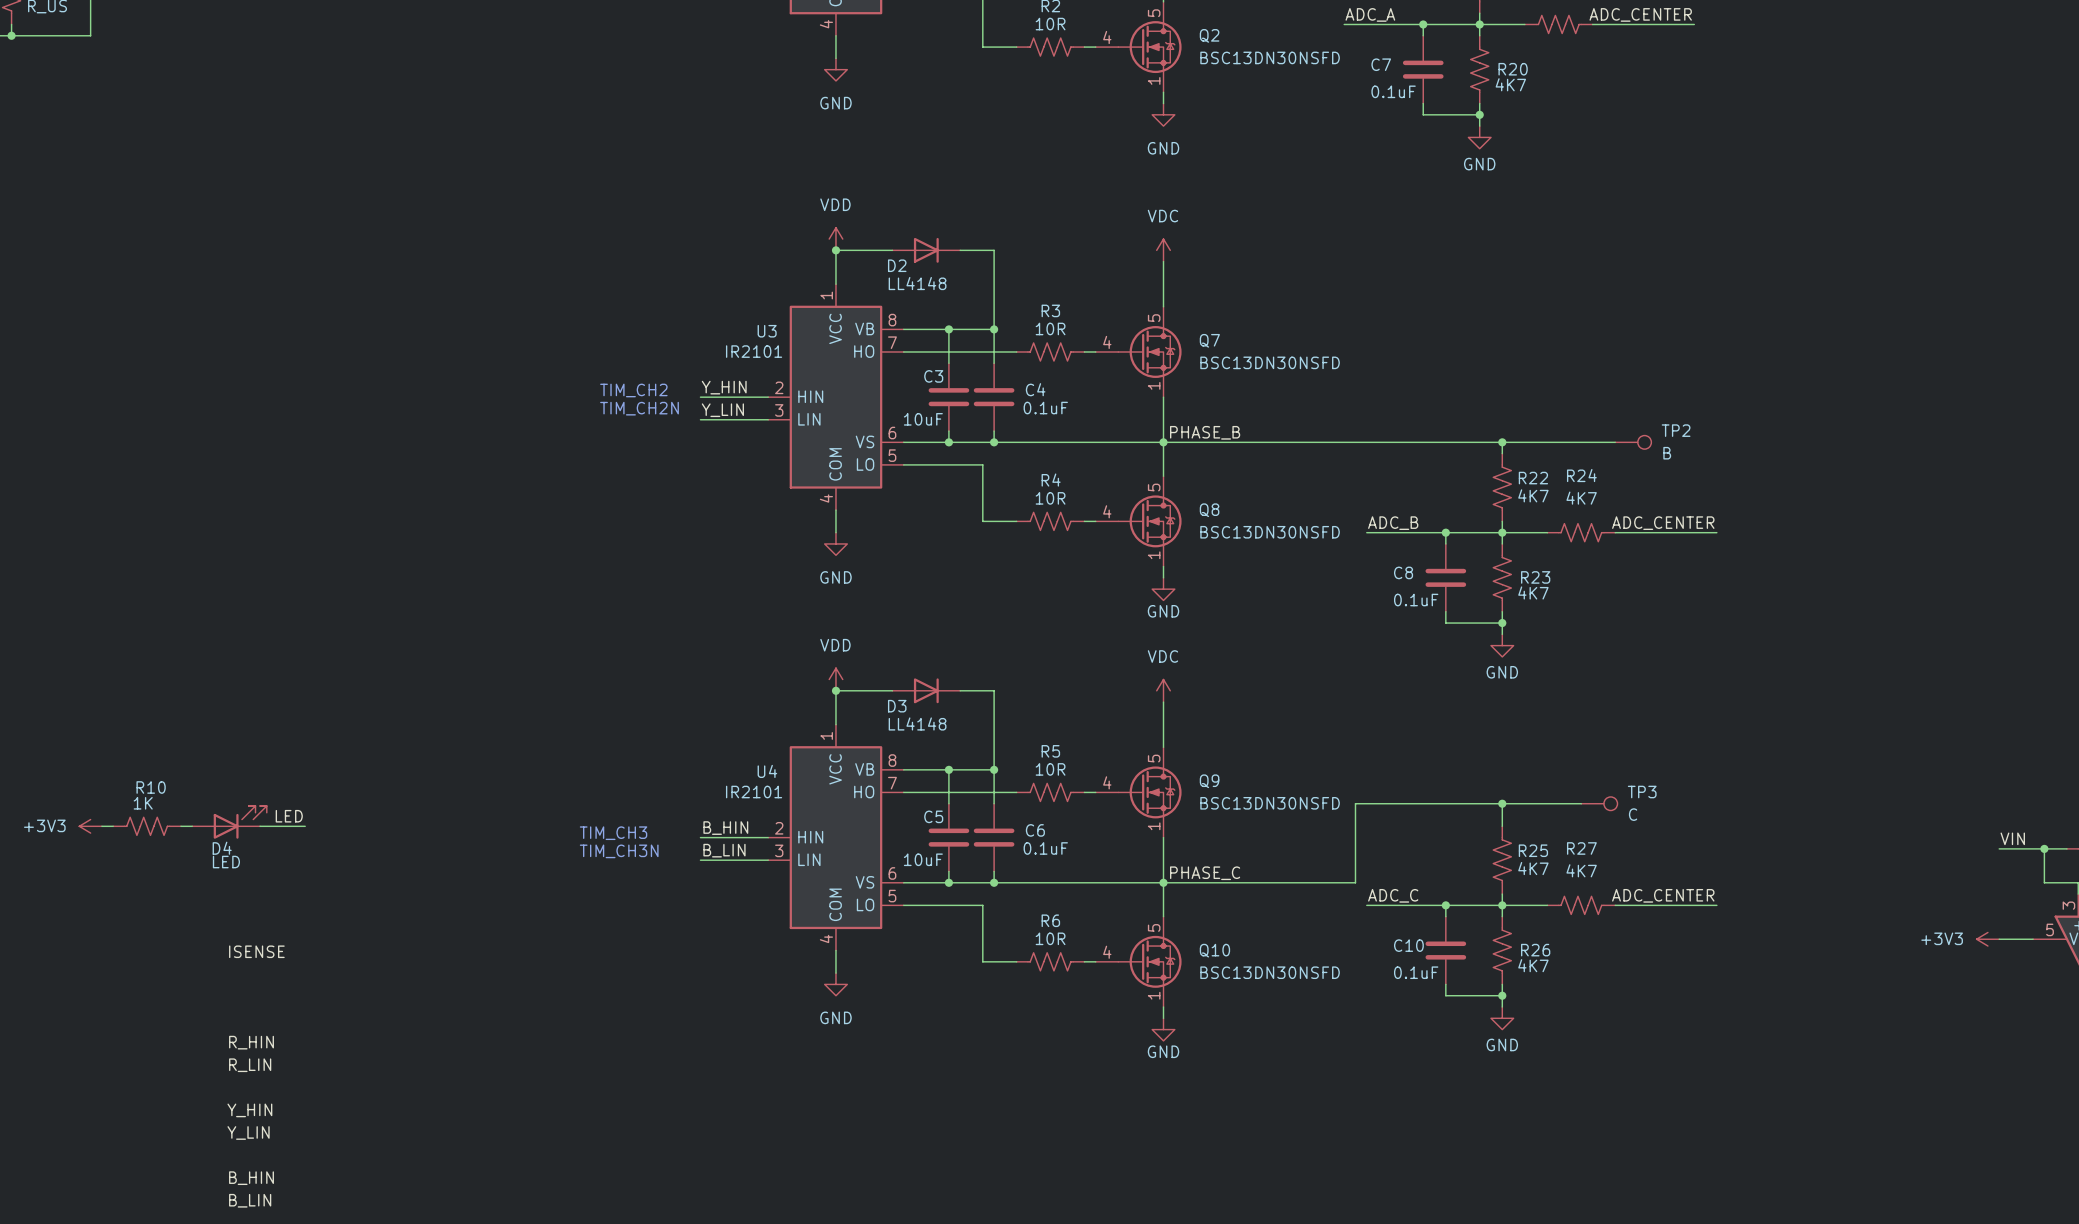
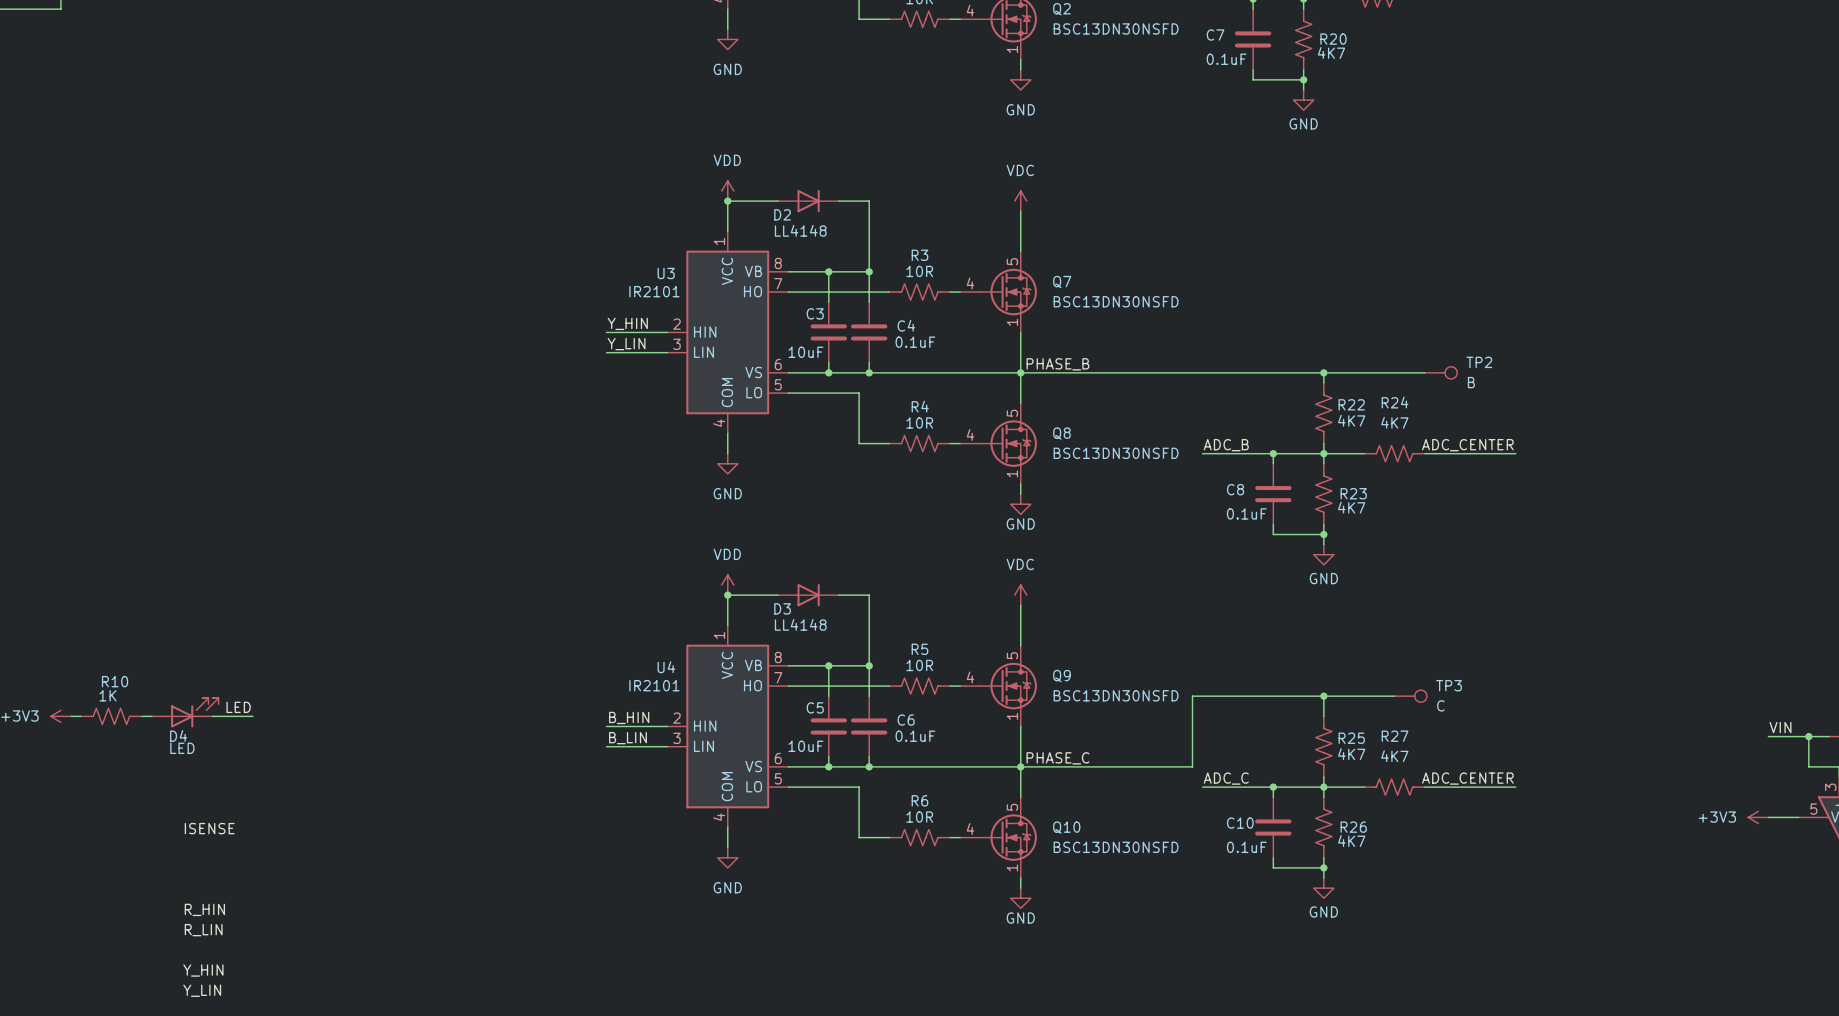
text: TIM_CH2 (633, 390) -> none
text: TIM_CH2N (639, 408) -> none
text: TIM_CH3 (613, 833) -> none
text: TIM_CH3N (619, 851) -> none

